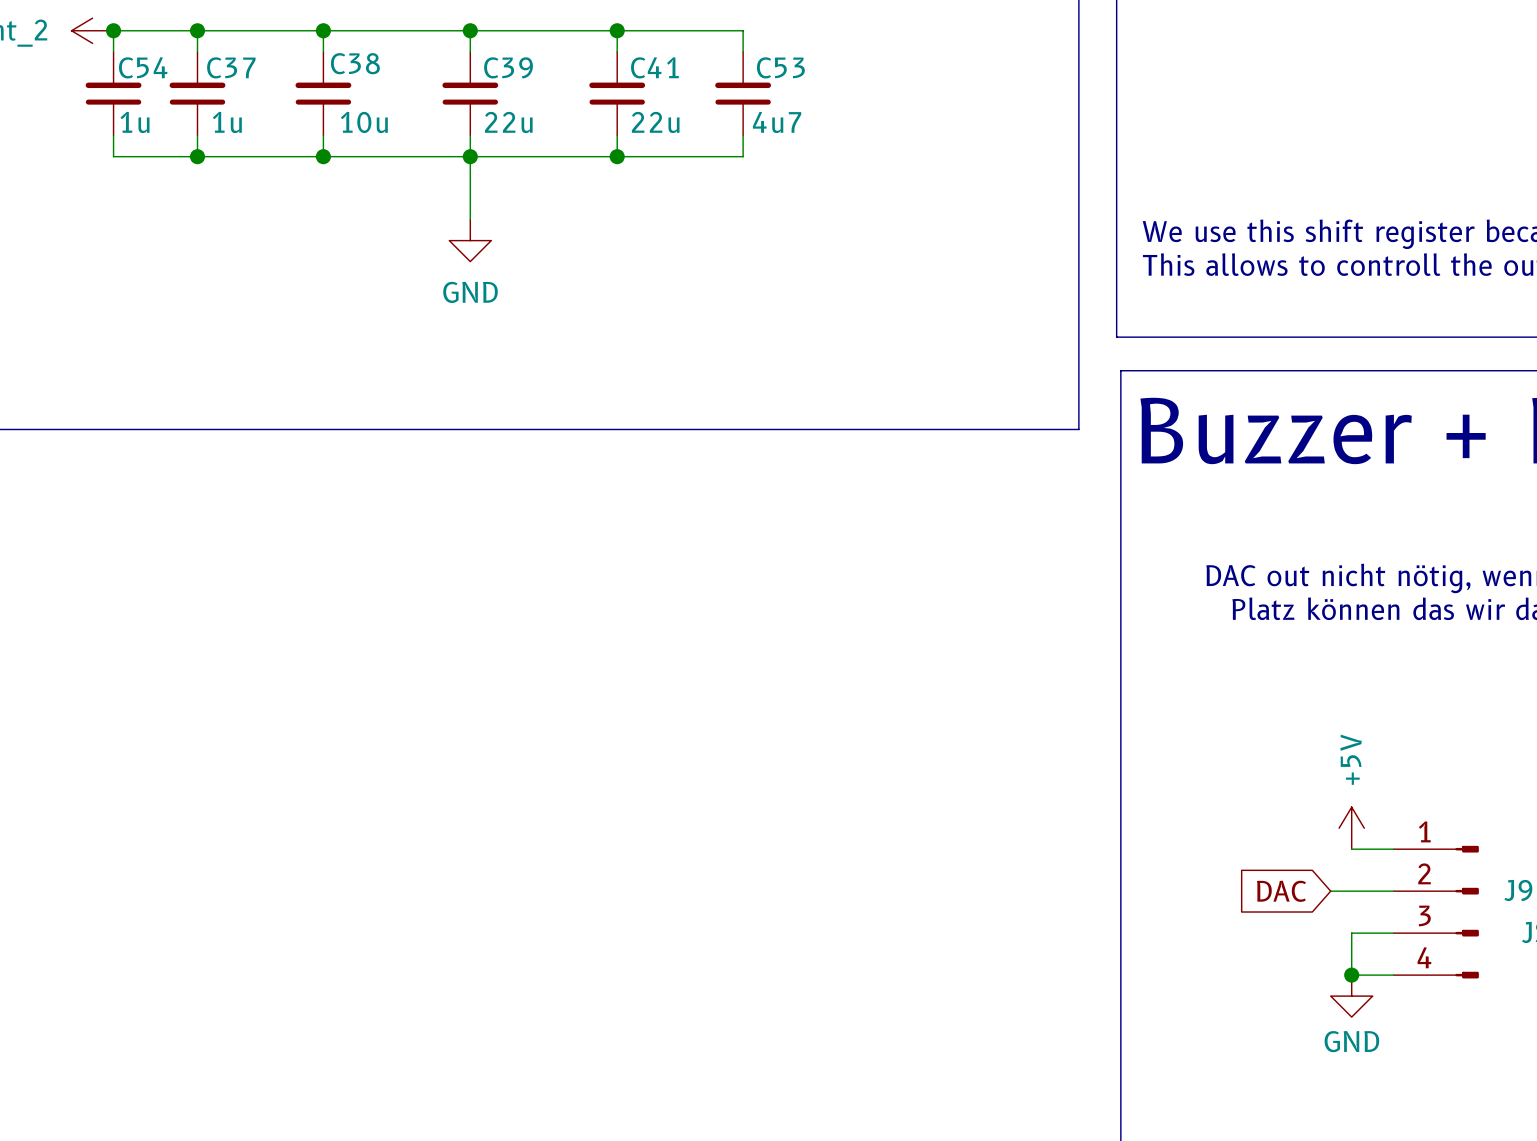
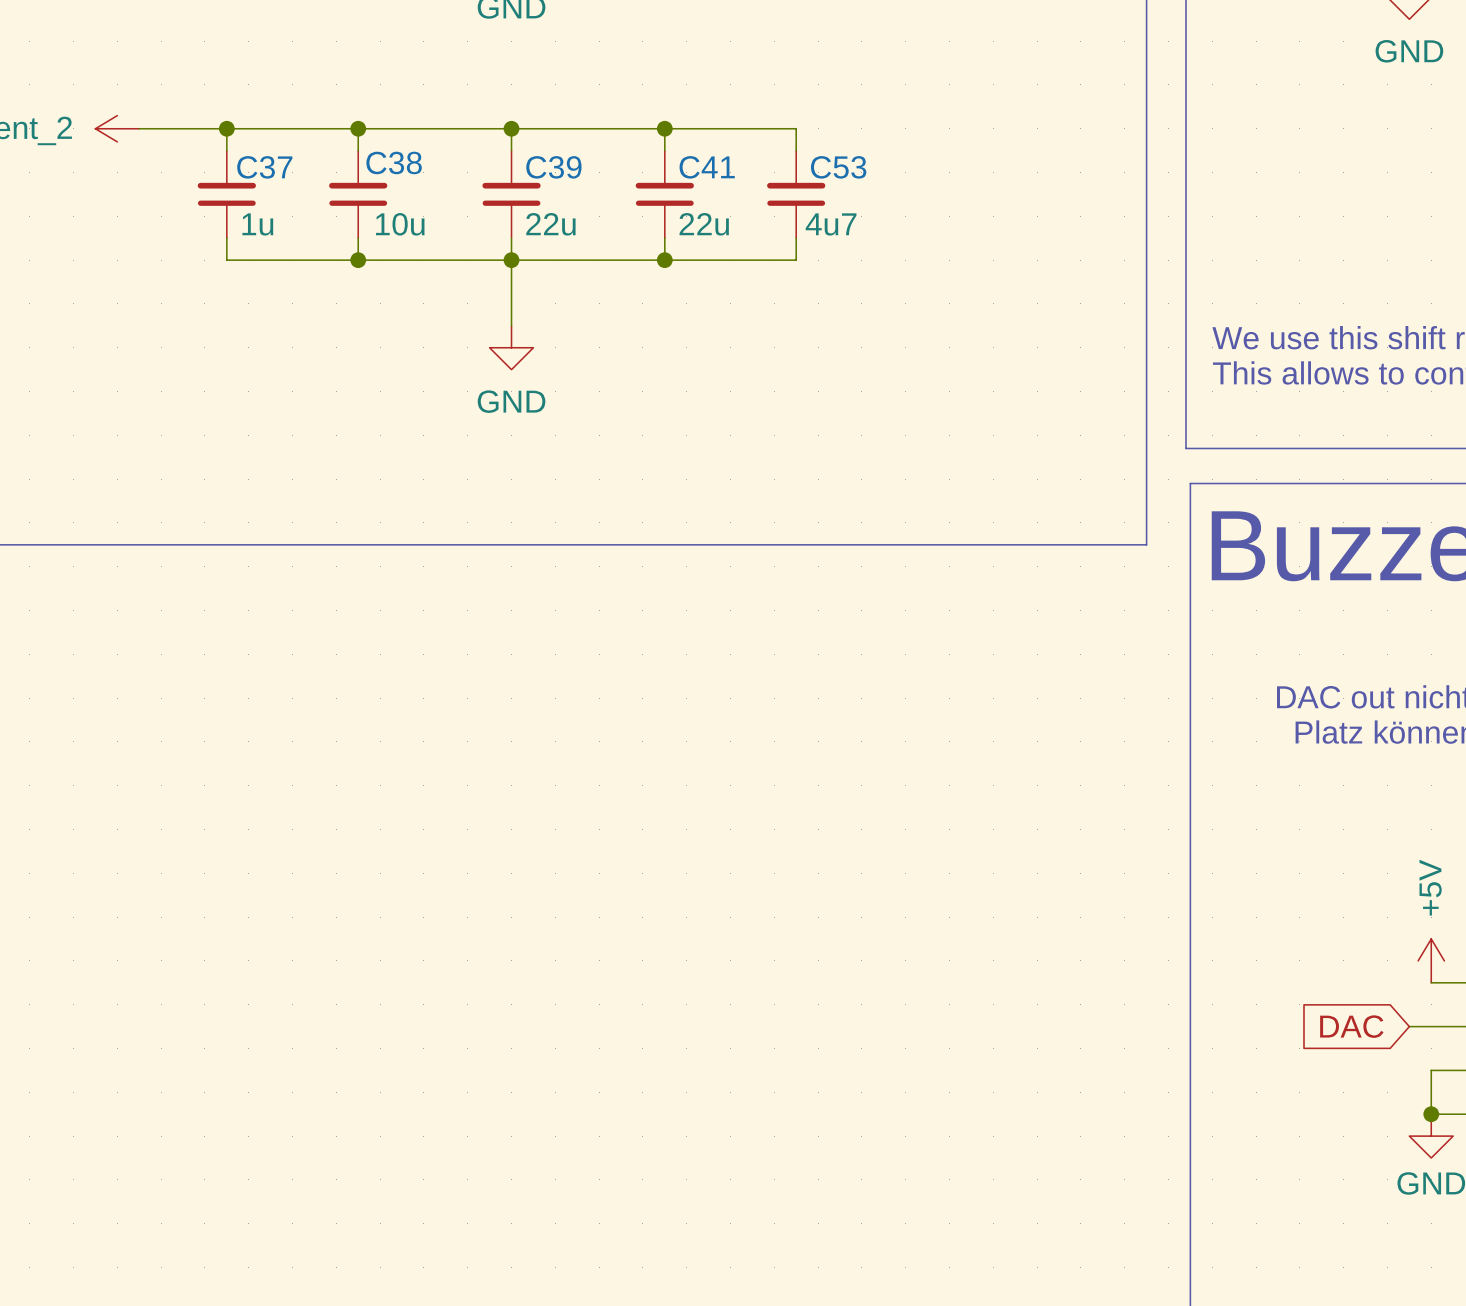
wire: (113, 30) (113, 51) -> none
junction: (113, 30) -> none
C54: 1u (113, 93) -> none
wire: (113, 135) (113, 156) (197, 156) -> none
junction: (197, 156) -> none

